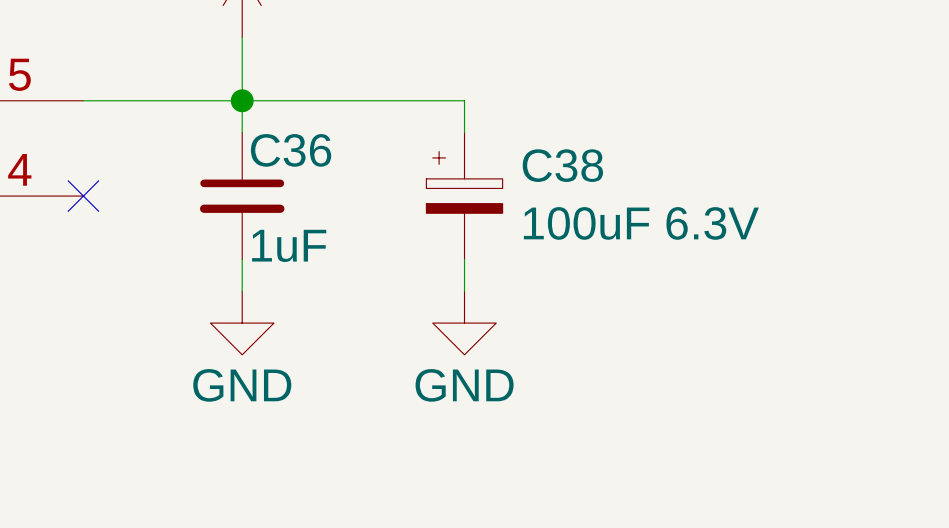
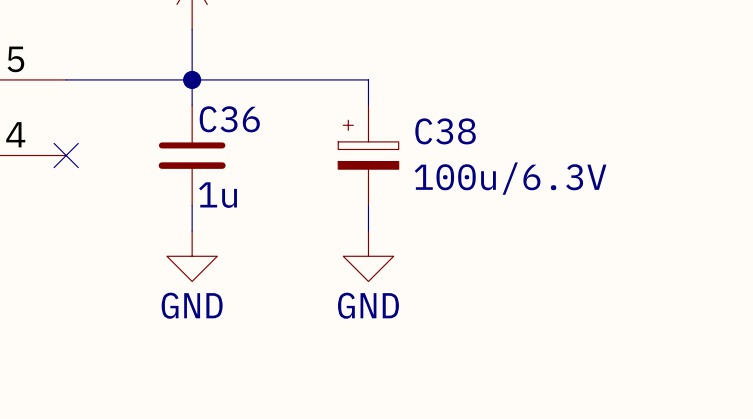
C38 value: 100uF 6.3V (641, 223) -> 100u/6.3V (510, 178)
C36 value: 1uF (289, 245) -> 1u (218, 195)

